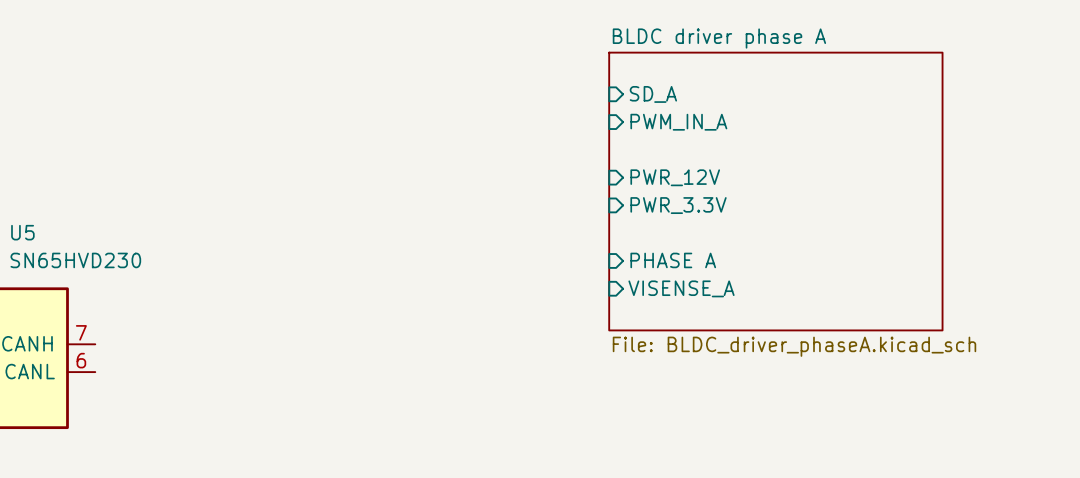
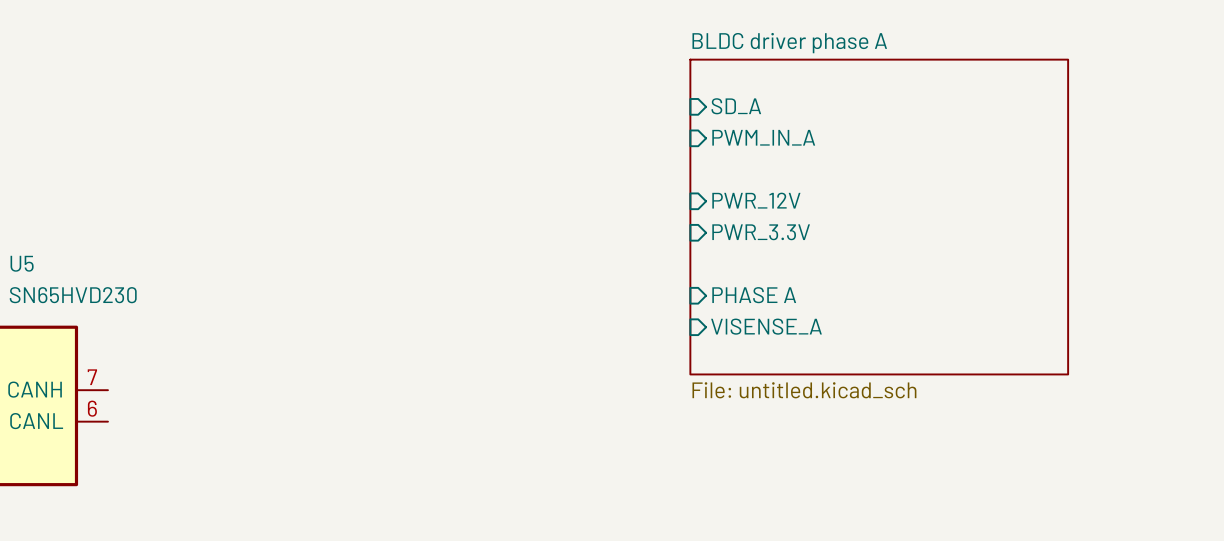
sheet BLDC driver phase A value: File: BLDC_driver_phaseA.kicad_sch (794, 346) -> File: untitled.kicad_sch (804, 390)

